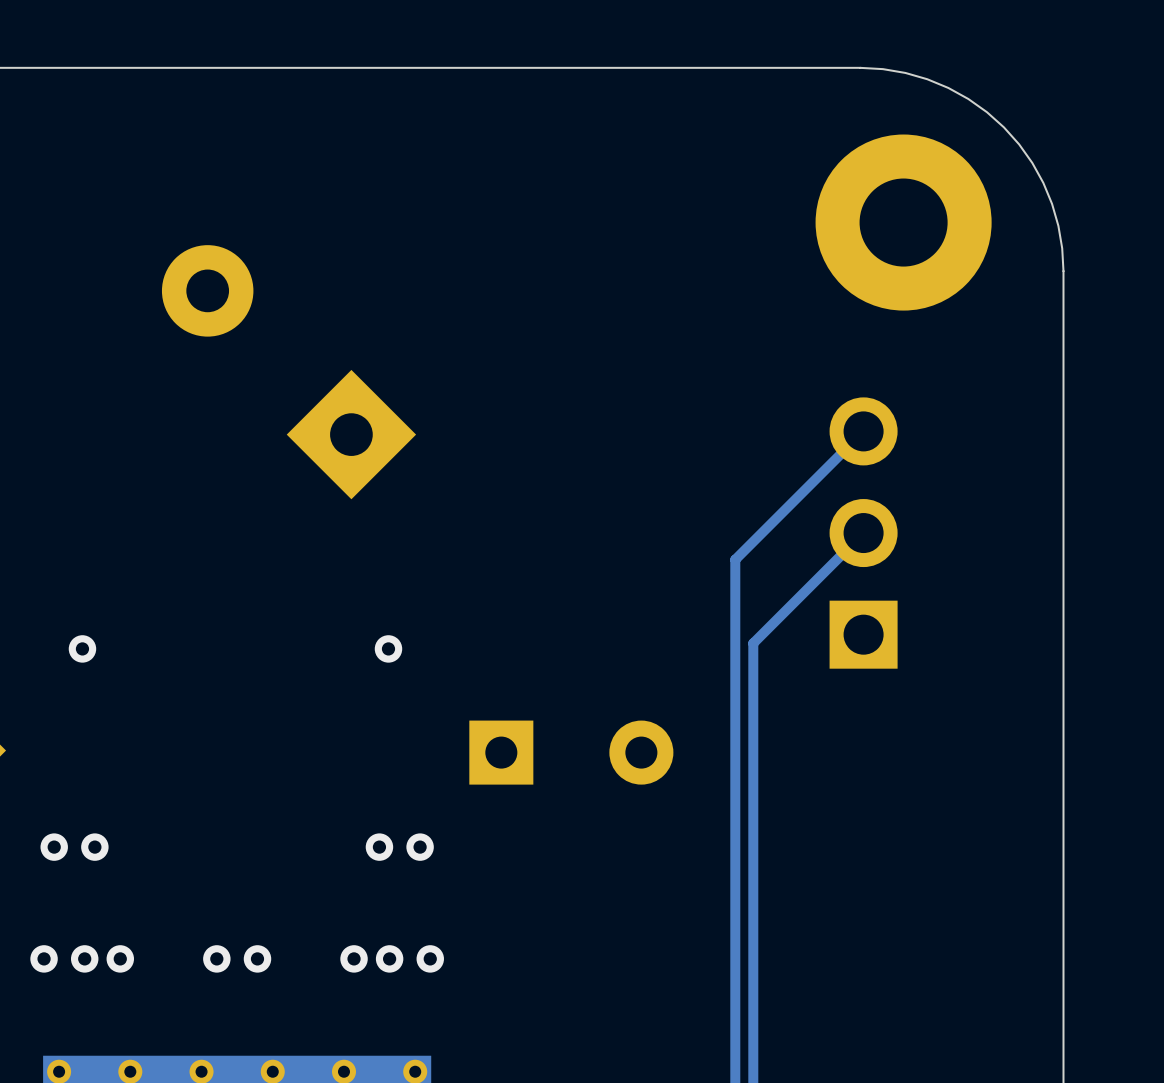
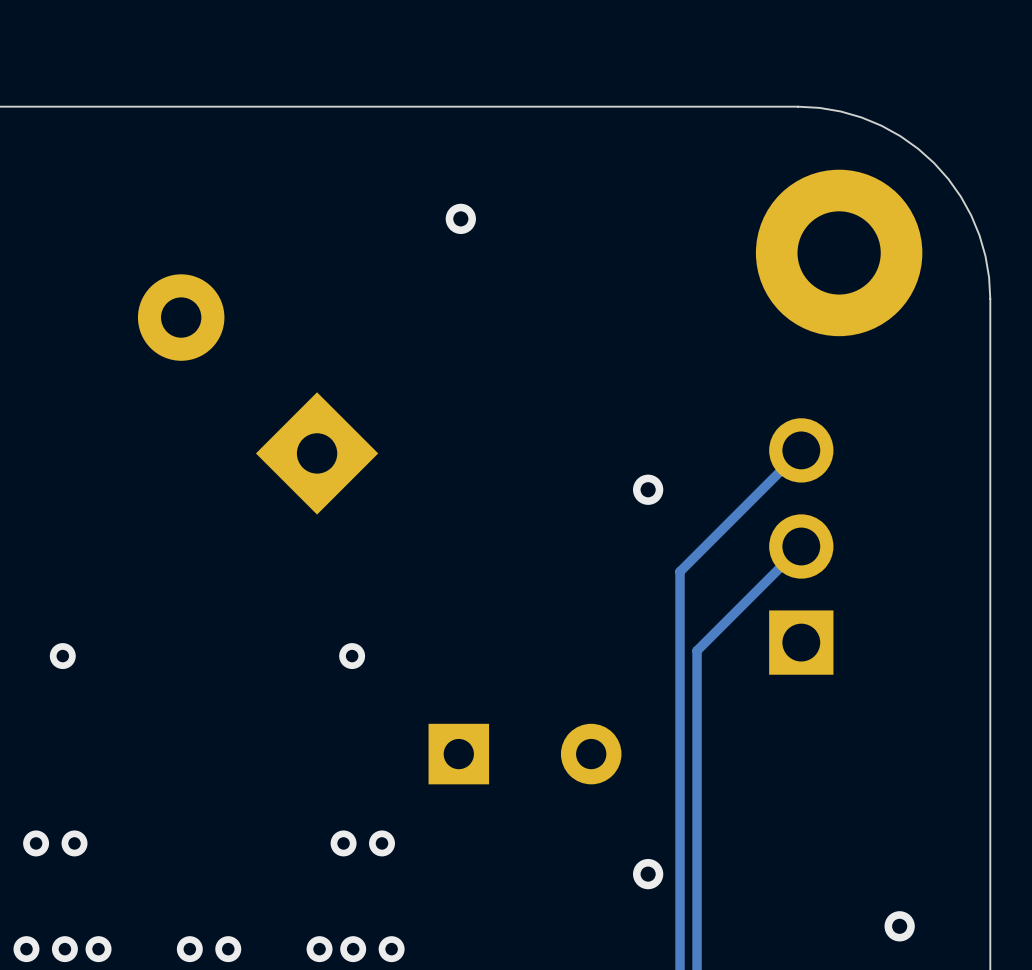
via: none -> (460, 218)
via: none -> (648, 489)
via: none -> (648, 874)
via: none -> (899, 926)

